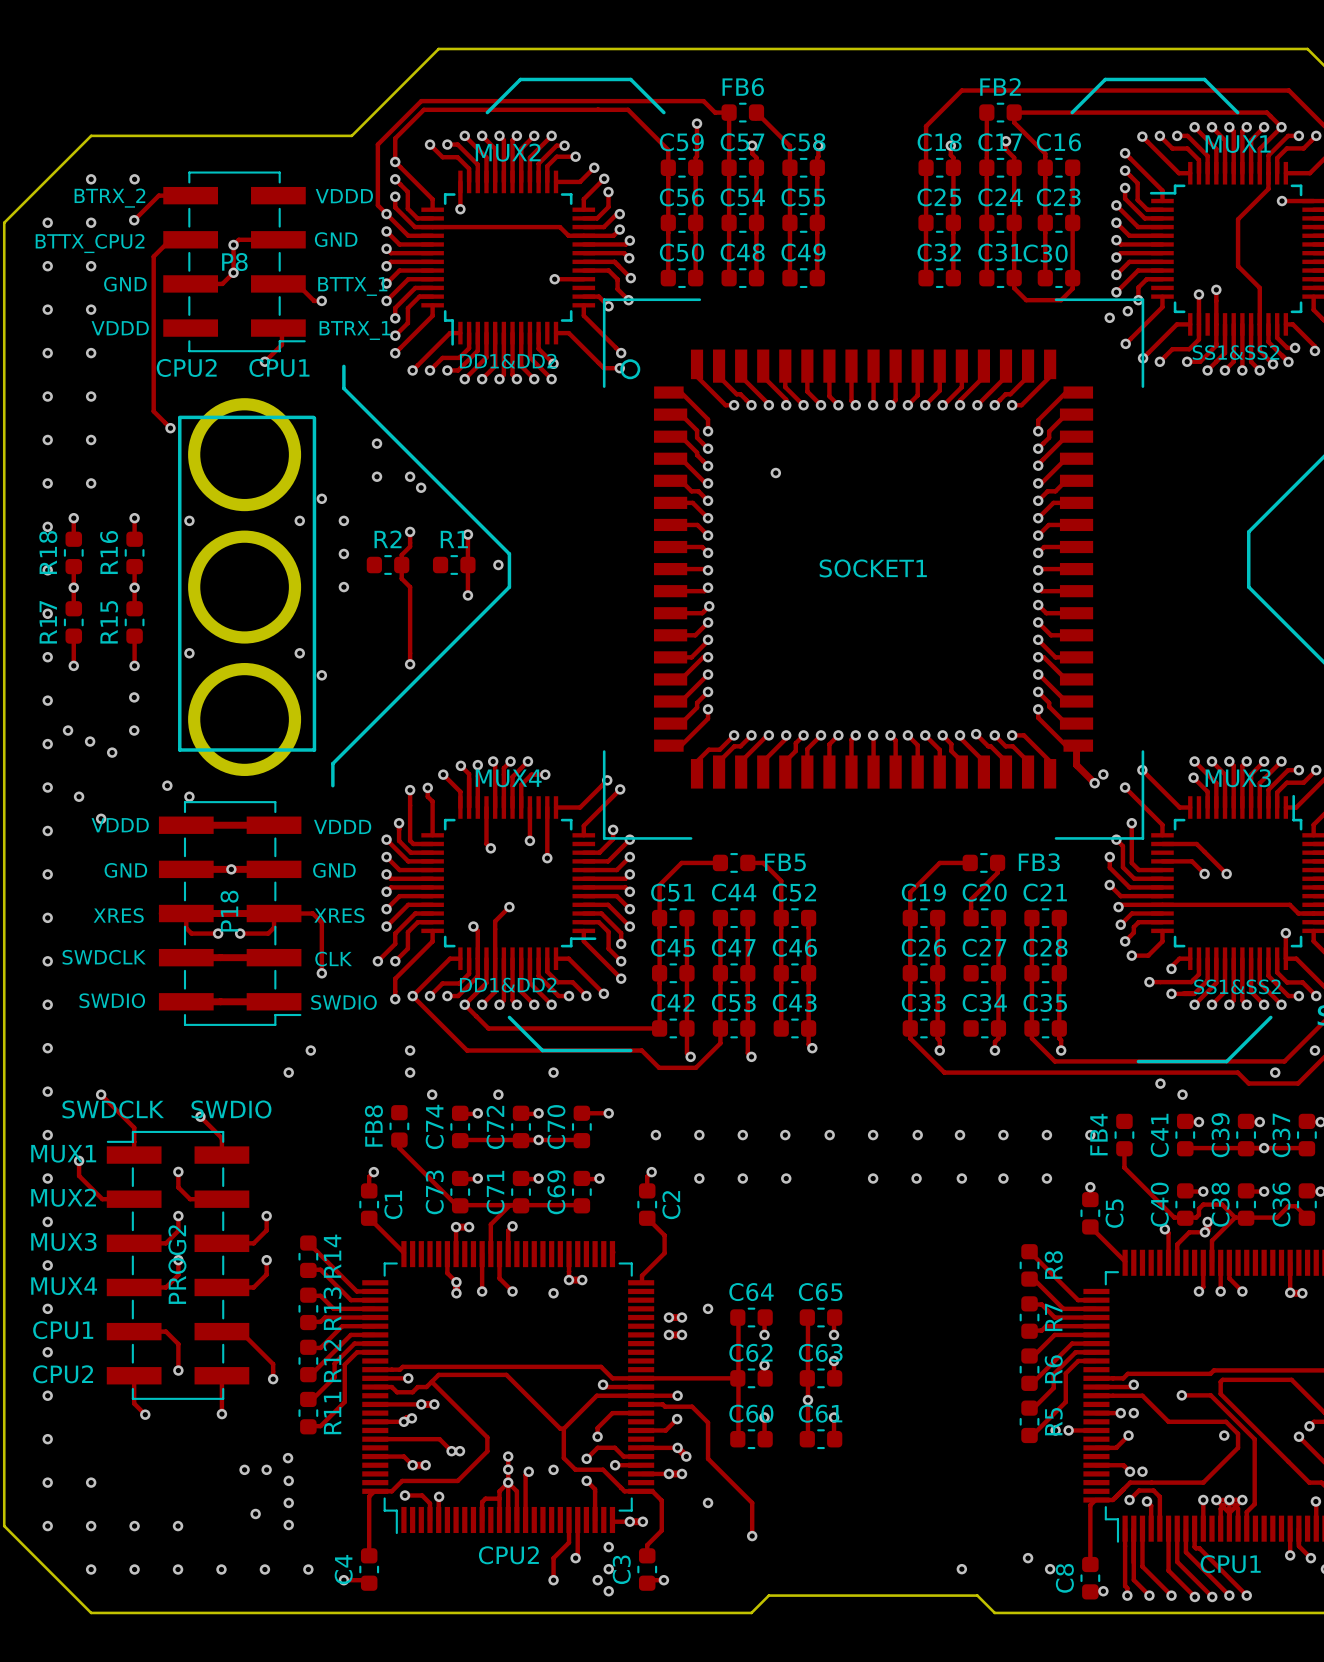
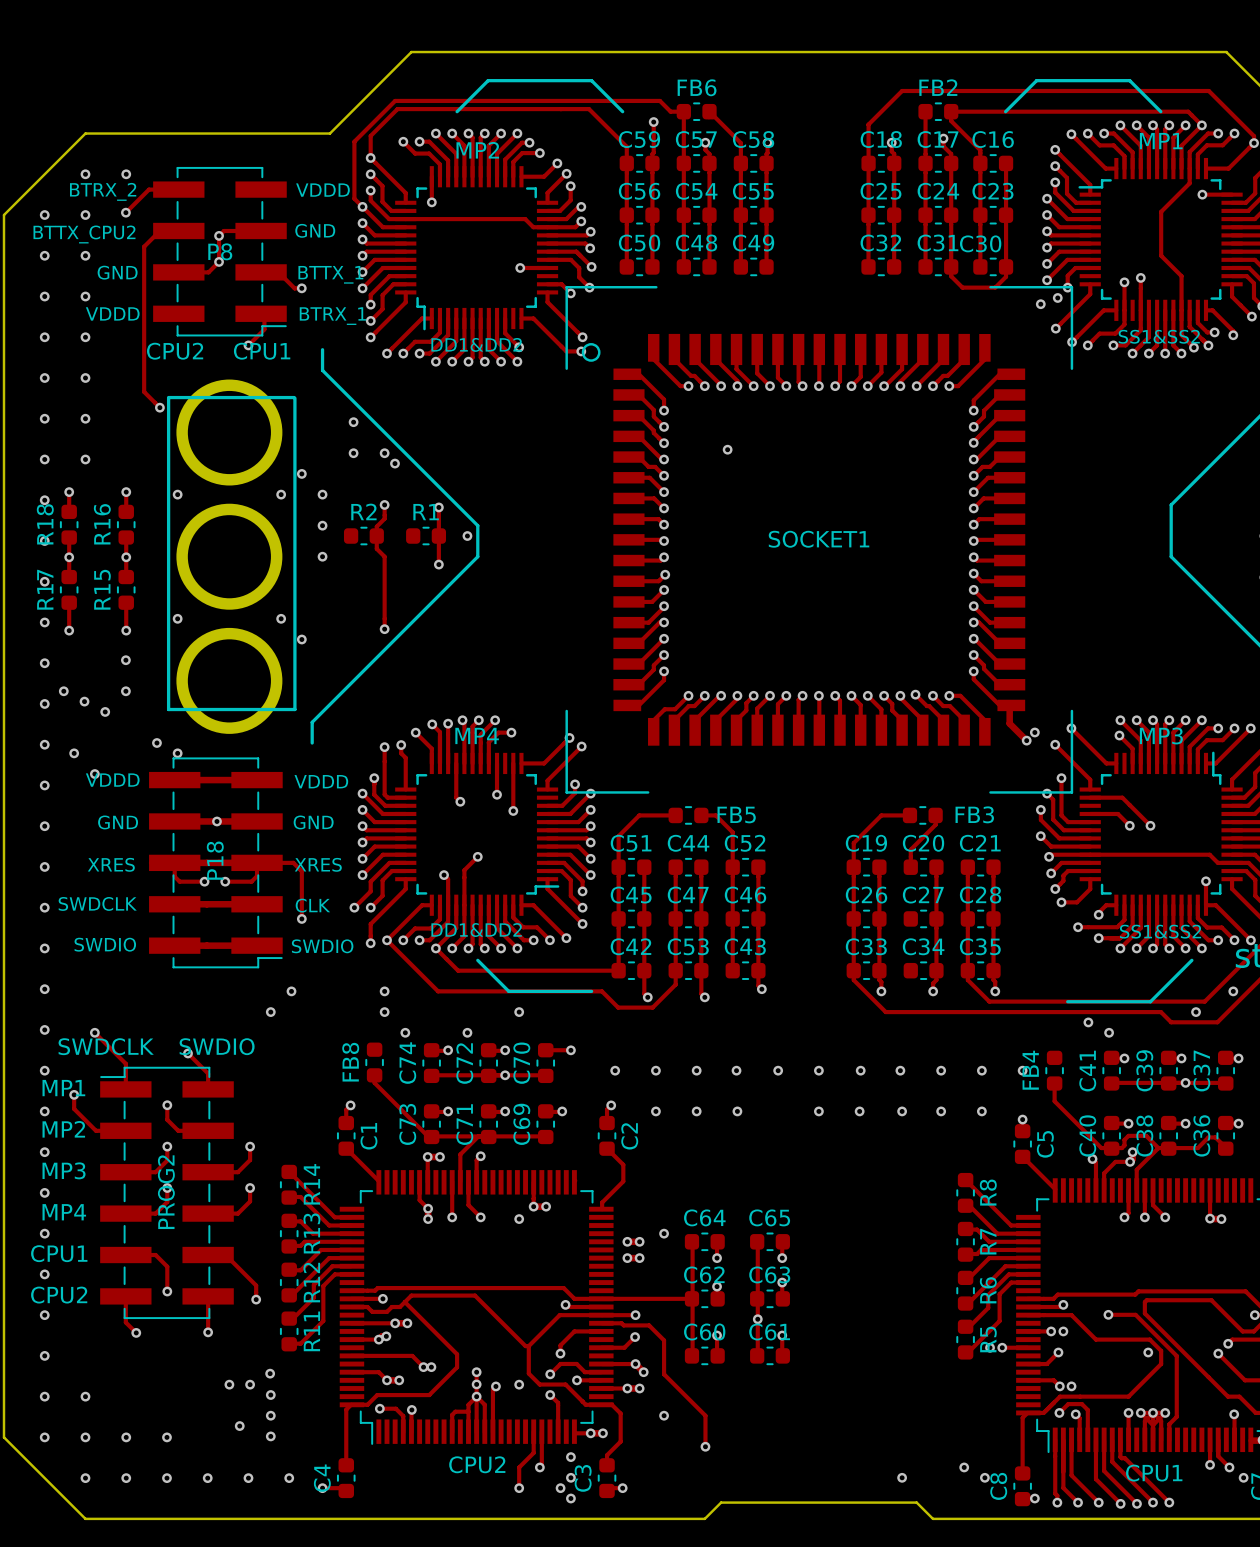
MUX1 name: MUX1 (1238, 144) -> MP1 (1161, 141)
MUX2 name: MUX2 (508, 152) -> MP2 (477, 150)
MUX4 name: MUX4 (508, 778) -> MP4 (477, 735)
MUX3 name: MUX3 (1238, 778) -> MP3 (1161, 735)
text: MUX1 (63, 1153) -> MP1 (63, 1088)
text: MUX2 (63, 1197) -> MP2 (63, 1129)
text: MUX3 (63, 1241) -> MP3 (64, 1170)
text: MUX4 (64, 1286) -> MP4 (64, 1212)

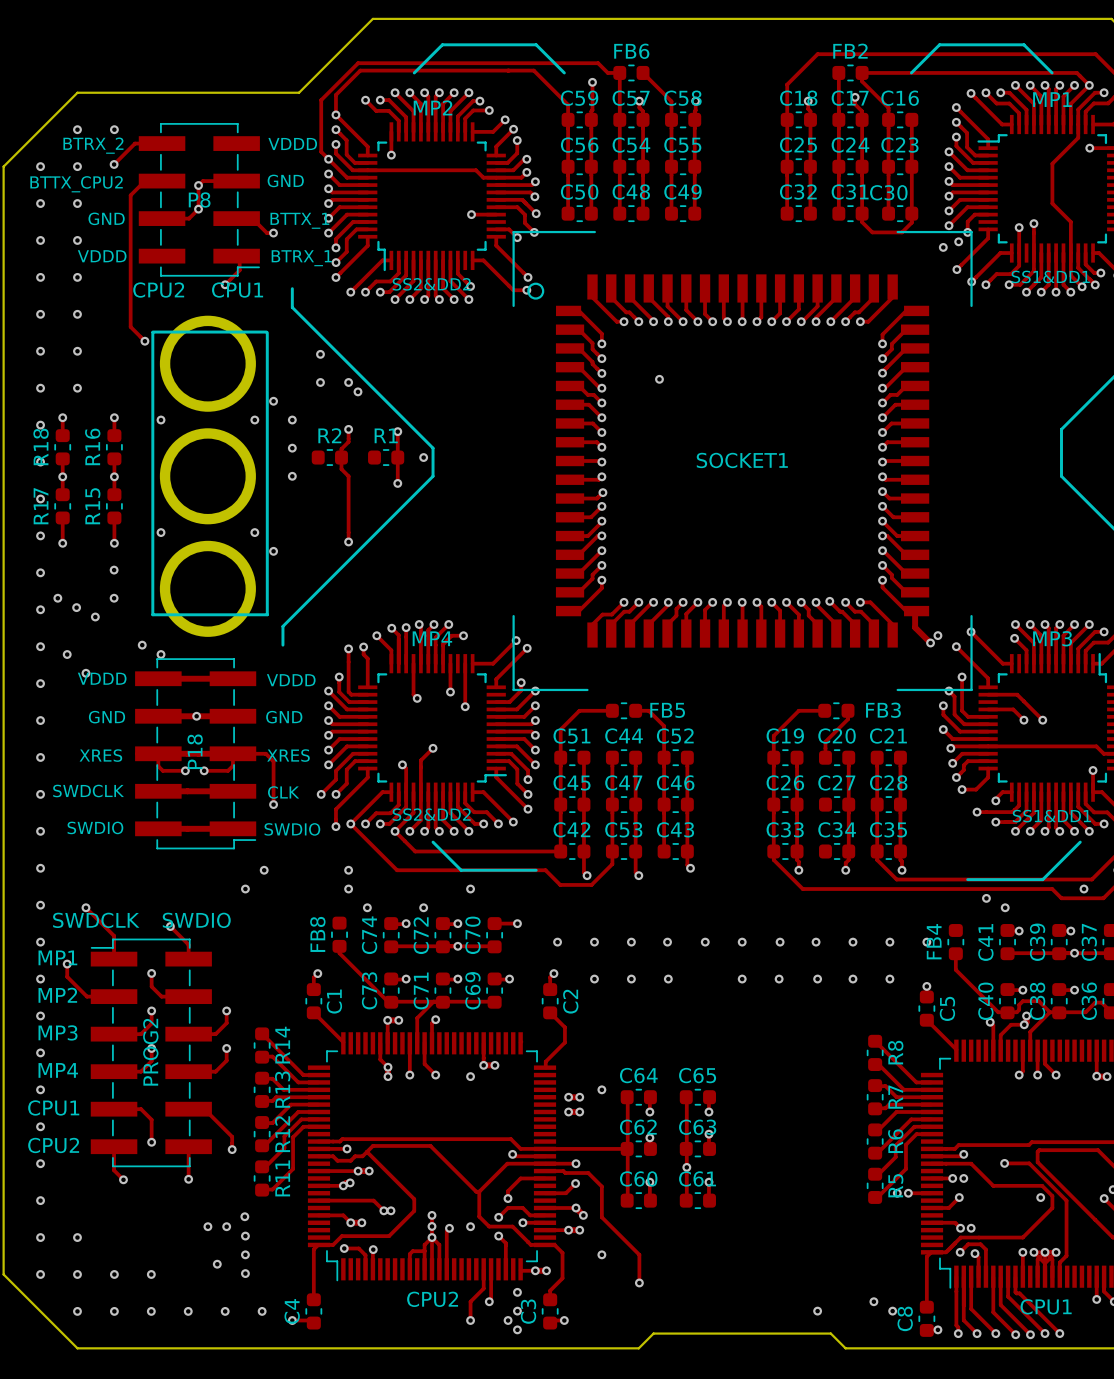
text: SS1&SS2 (1159, 336) -> SS1&DD1 (1050, 276)
text: DD1&DD2 (476, 344) -> SS2&DD2 (431, 284)
text: DD1&DD2 (476, 930) -> SS2&DD2 (431, 814)
text: SS1&SS2 (1160, 931) -> SS1&DD1 (1051, 816)

